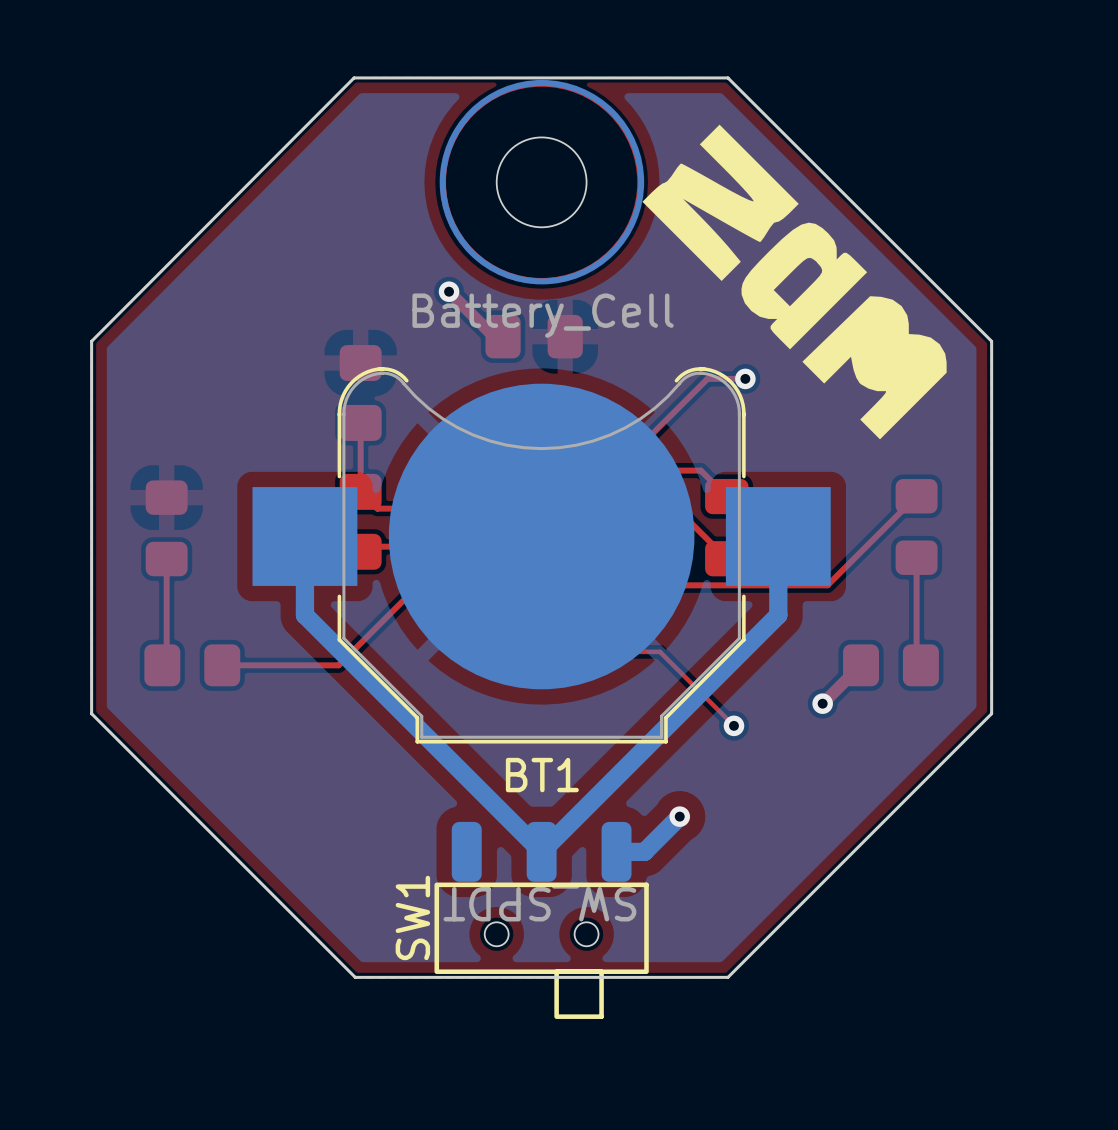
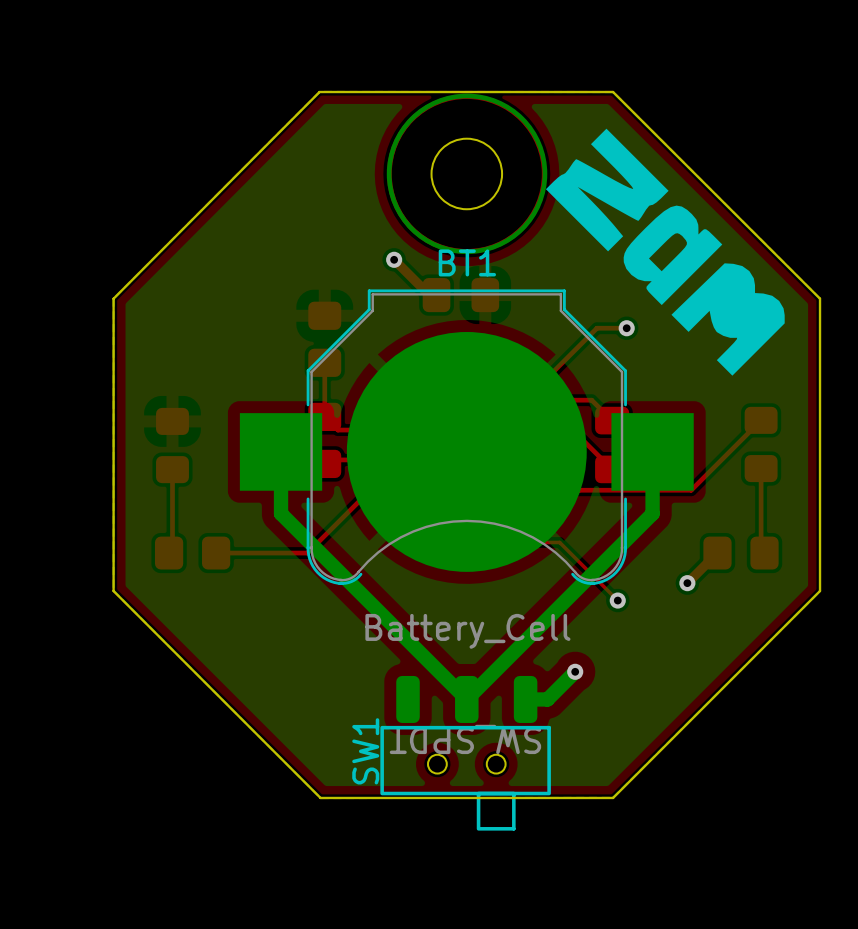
BT1 rotation: 0° (541, 555) -> 180° (466, 437)
SW1 footprint: [434, 821, 649, 1019] -> [380, 675, 551, 831]

